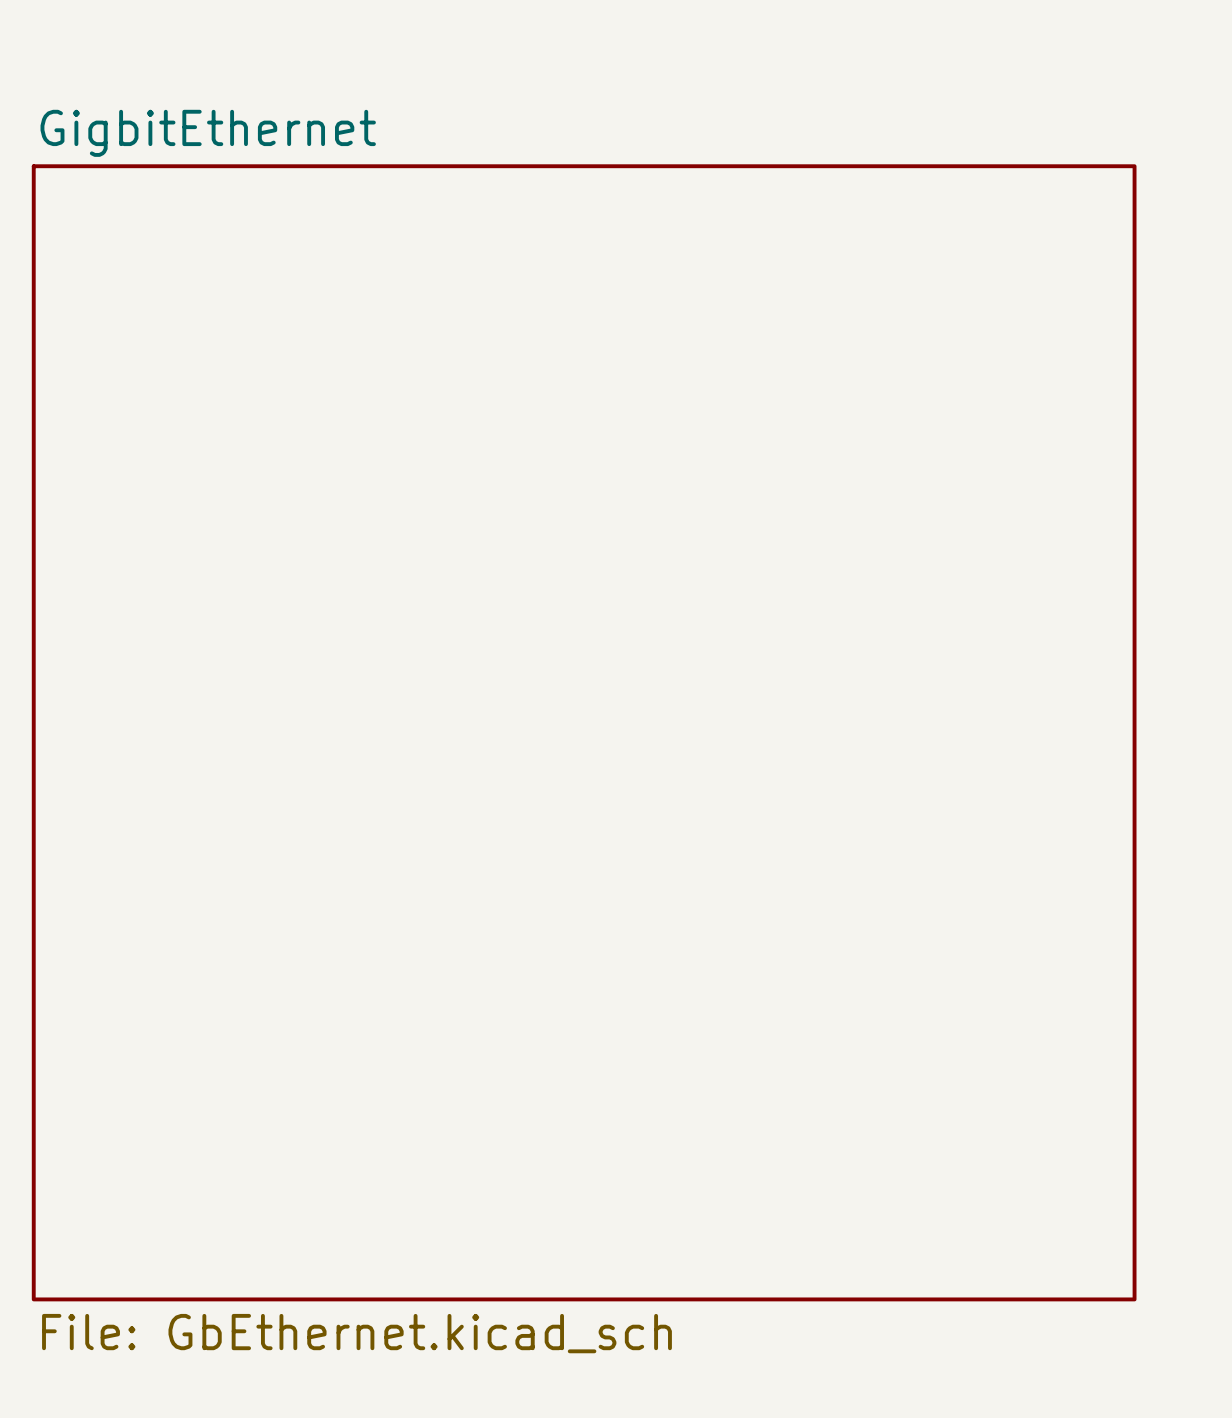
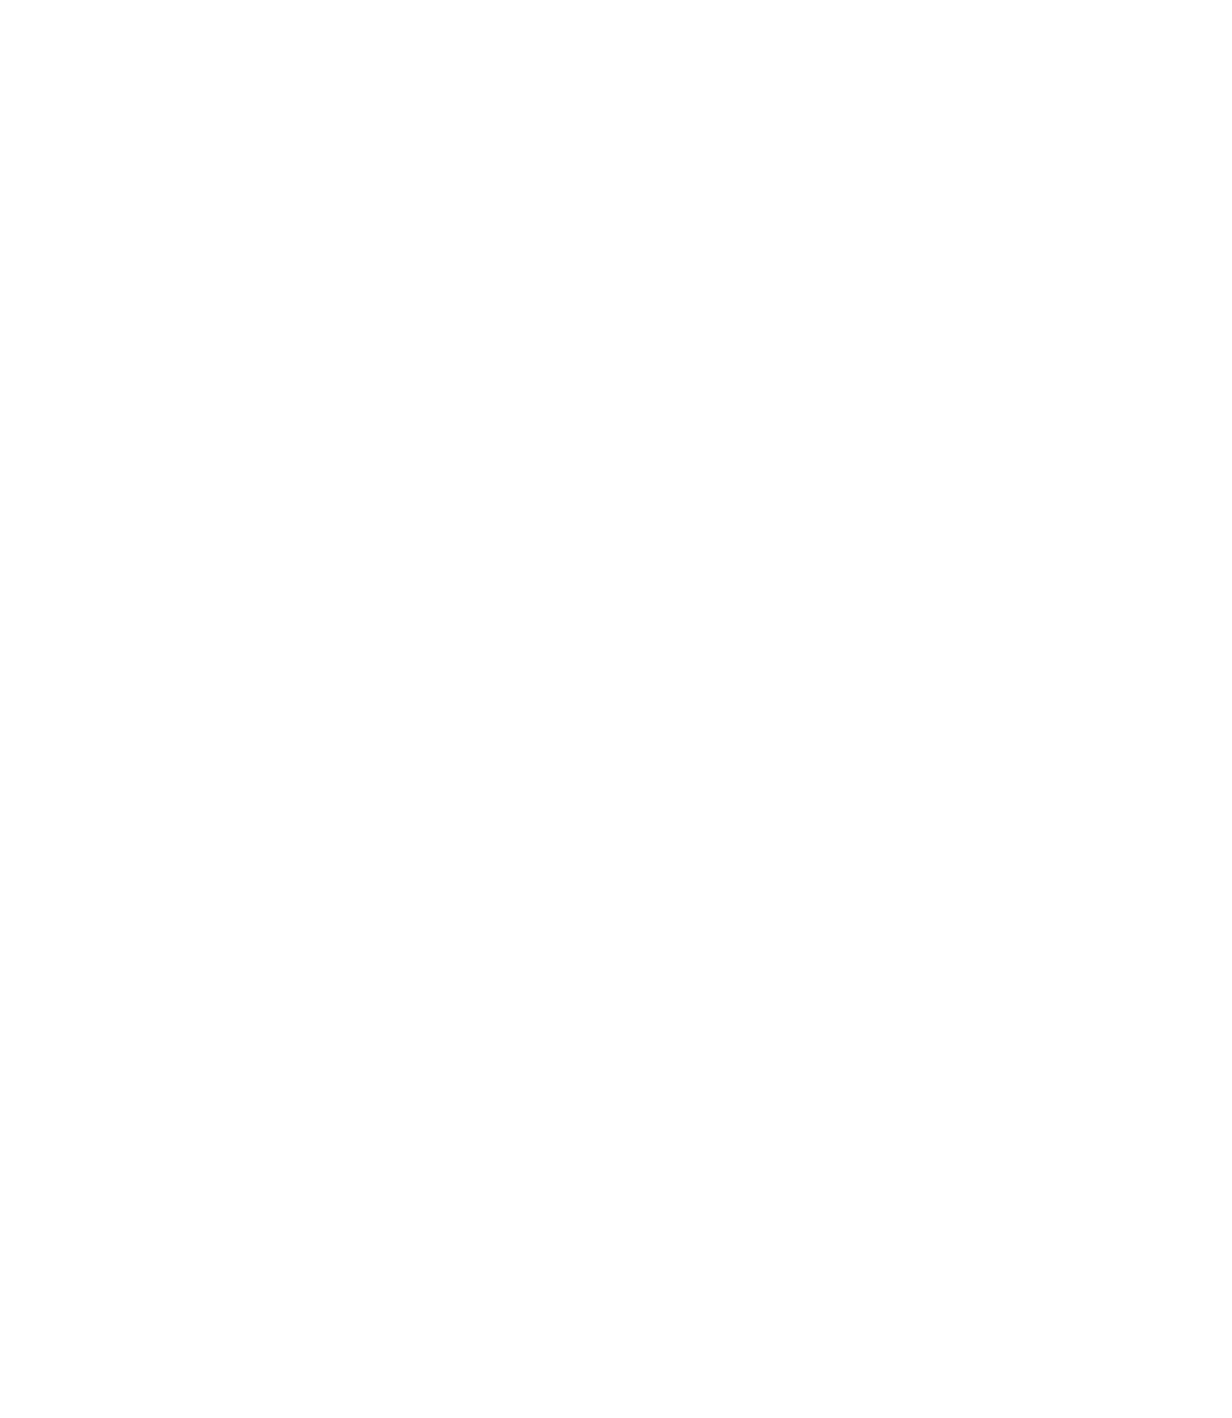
sheet GigbitEthernet: File: GbEthernet.kicad_sch (584, 732) -> none

